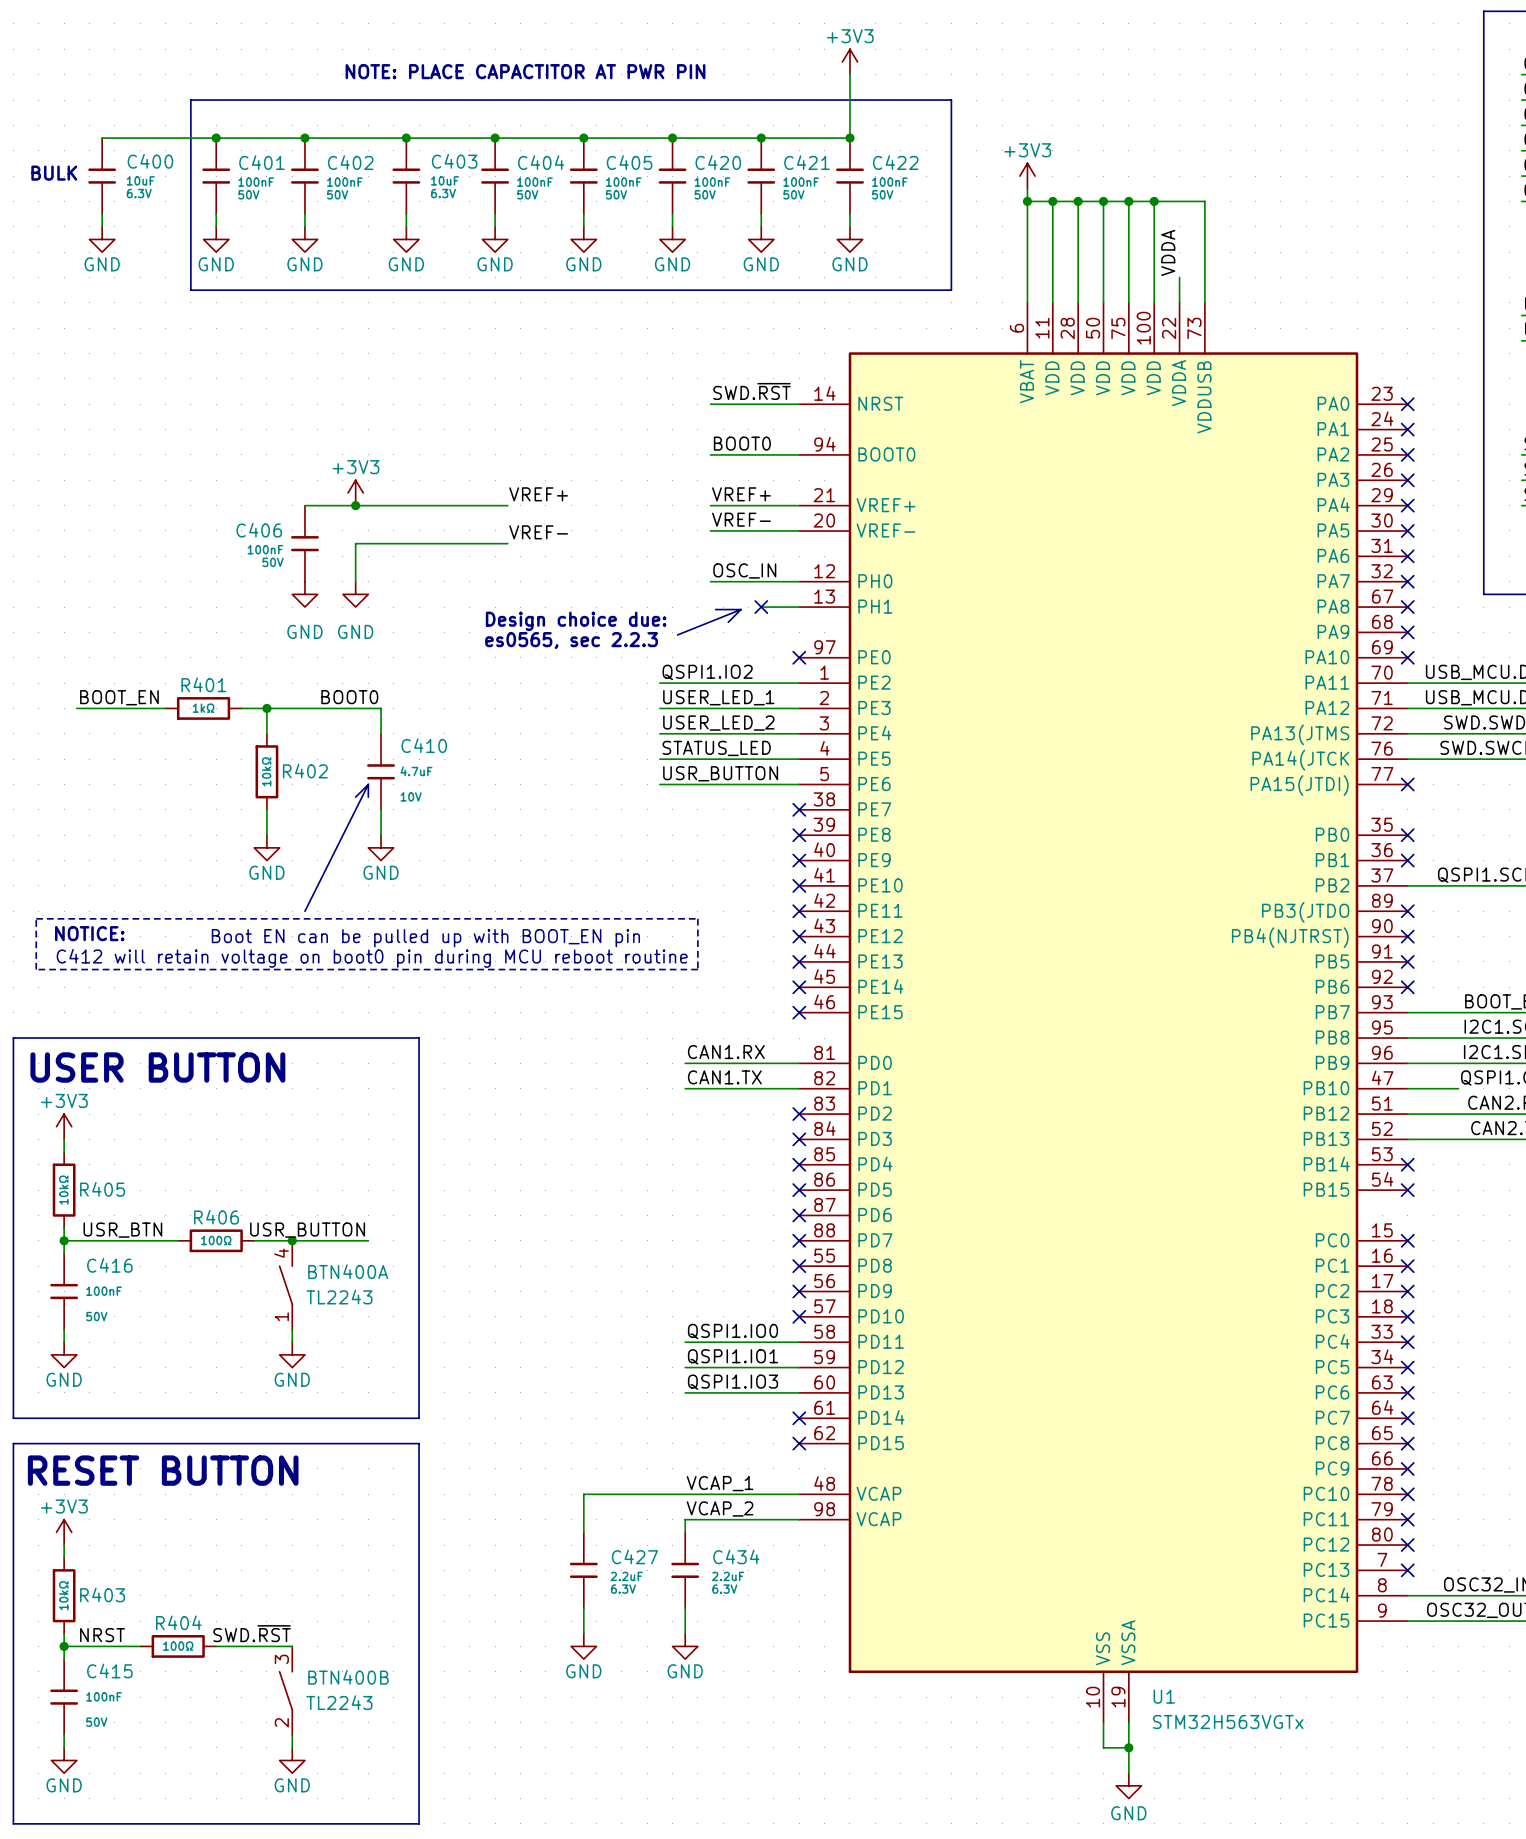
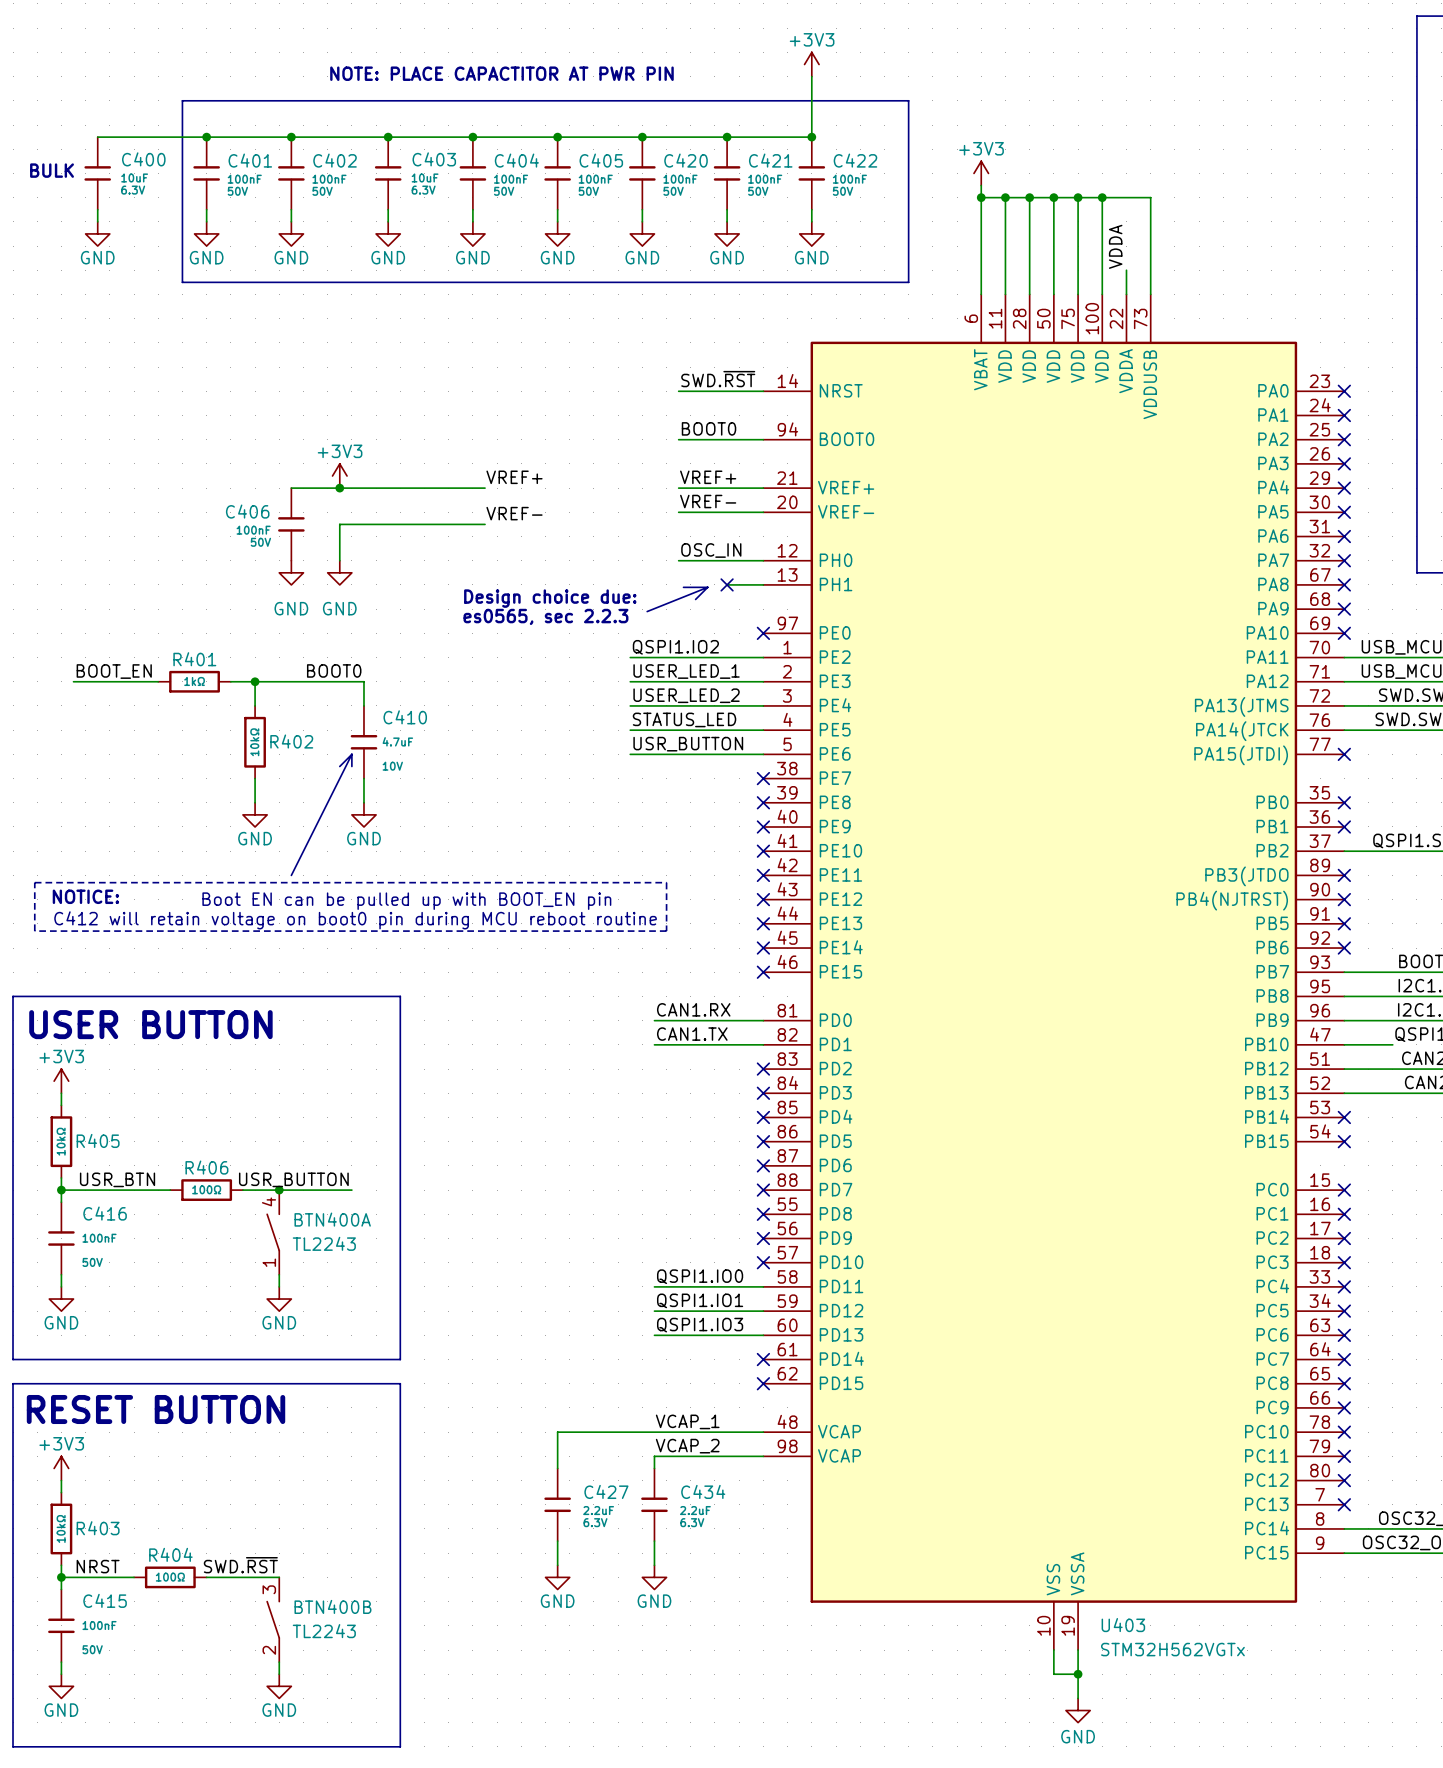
U1 name: U1 (1164, 1696) -> U403 (1123, 1625)
U1 value: STM32H563VGTx (1228, 1722) -> STM32H562VGTx (1172, 1649)

